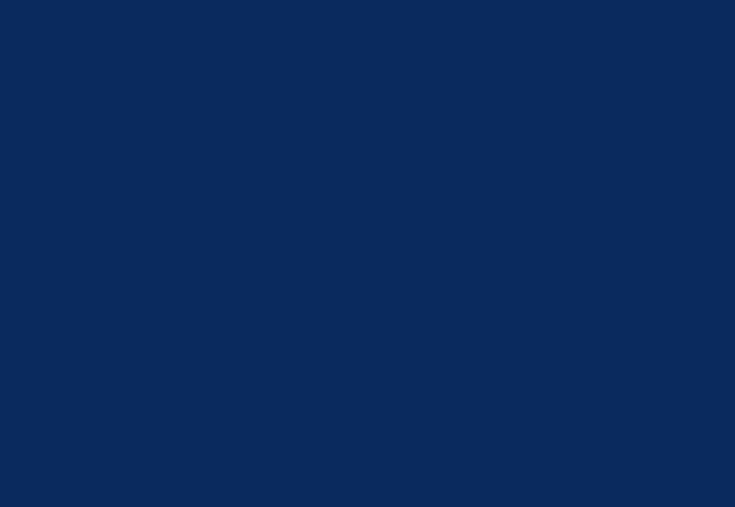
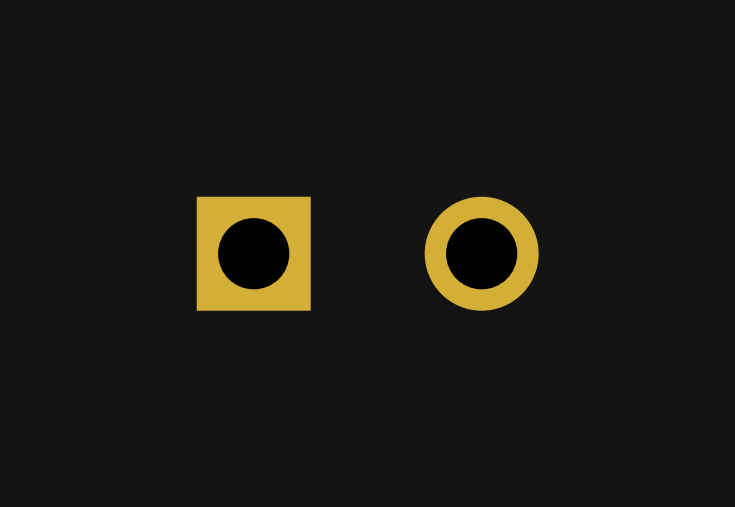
part: none -> (367, 253)

